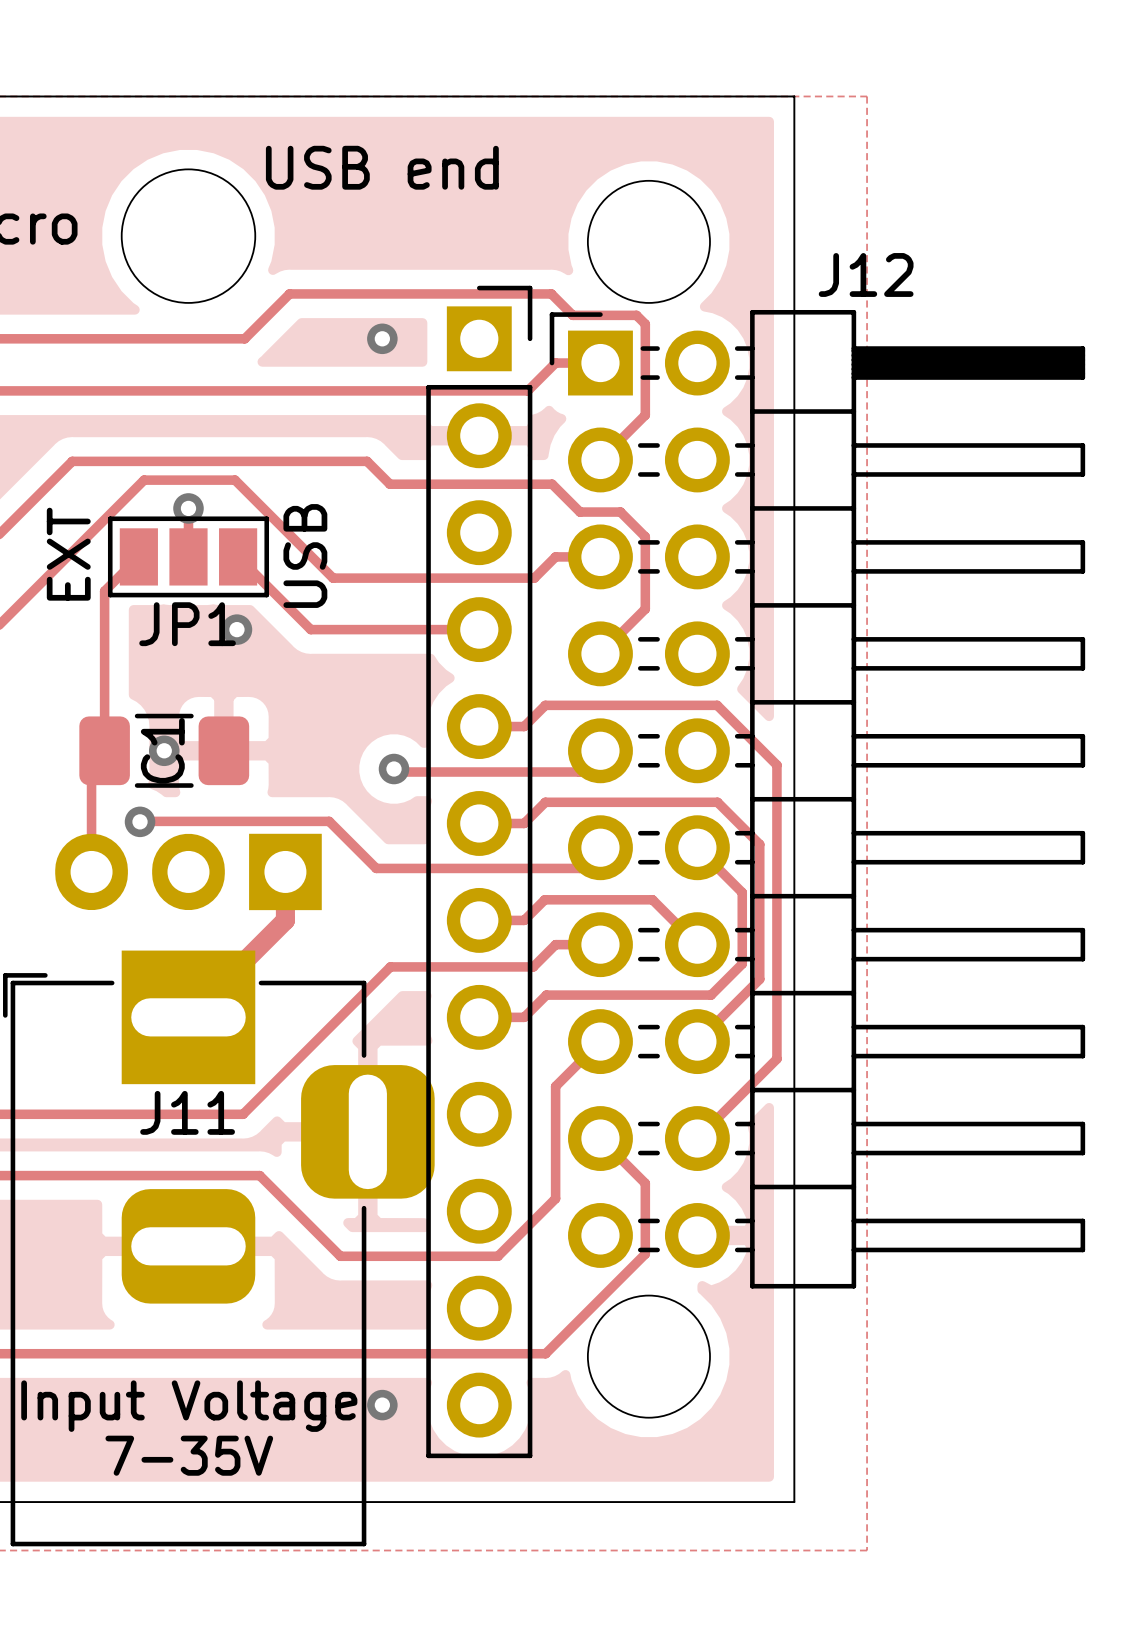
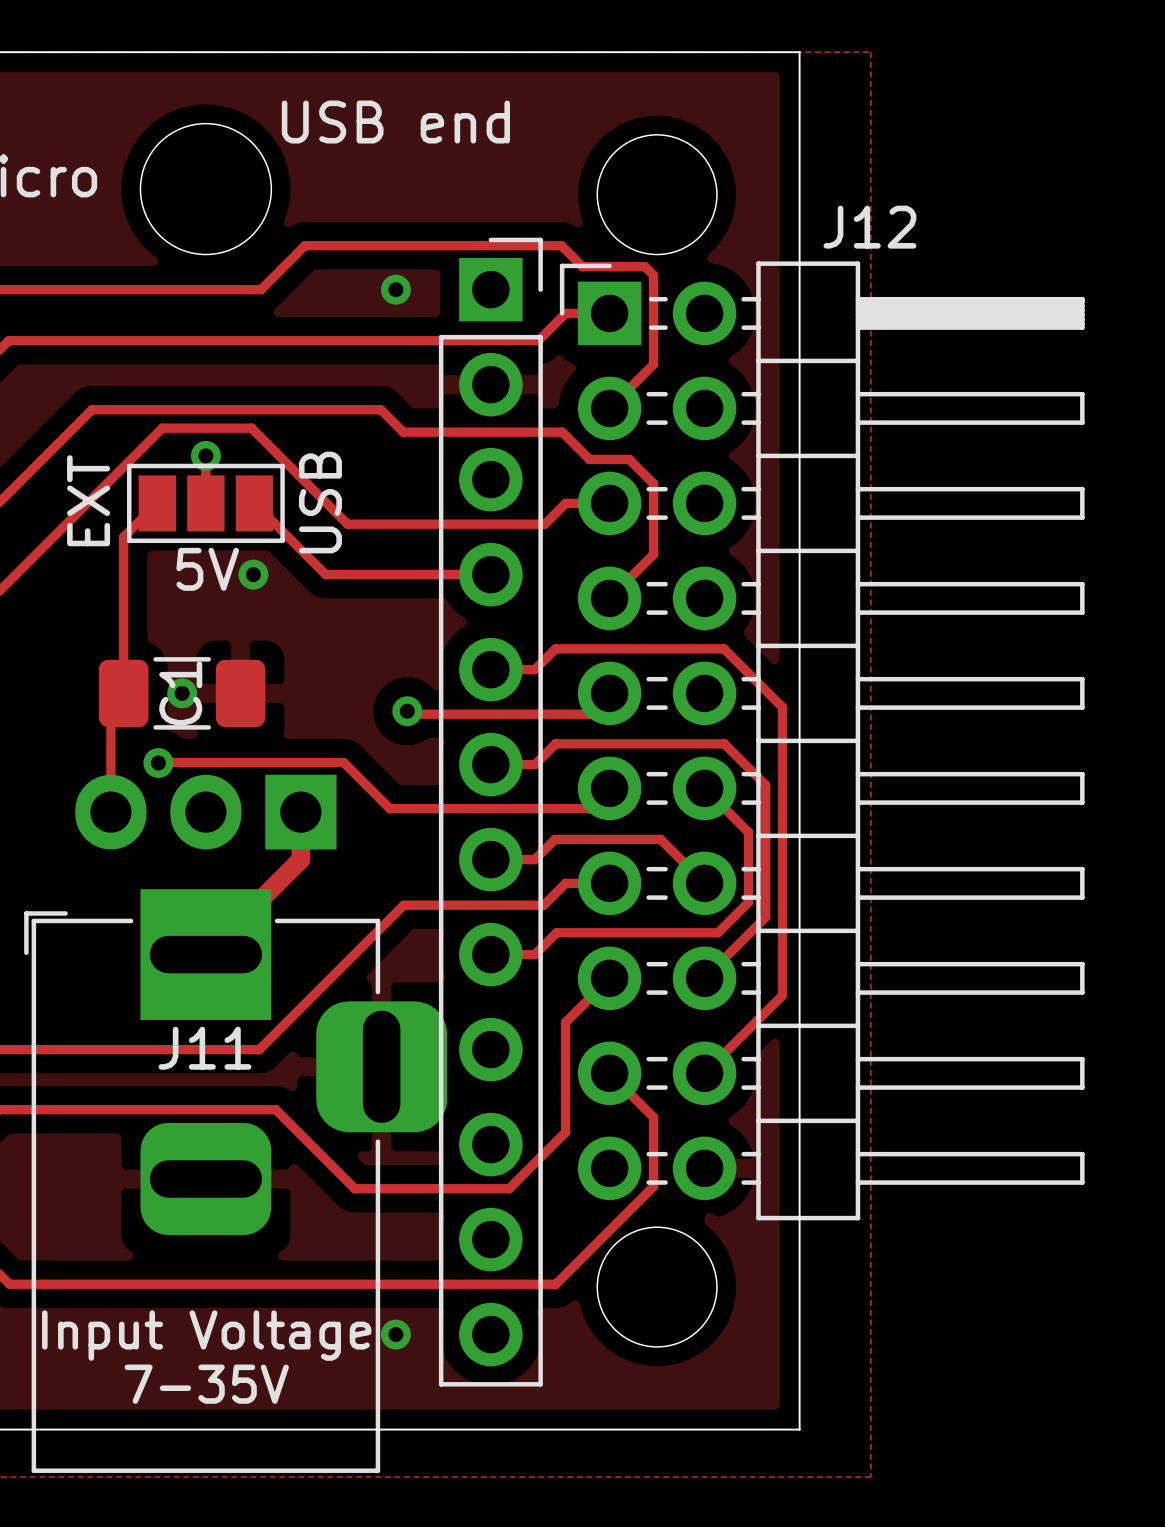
JP1 name: JP1 (187, 624) -> 5V (207, 569)

